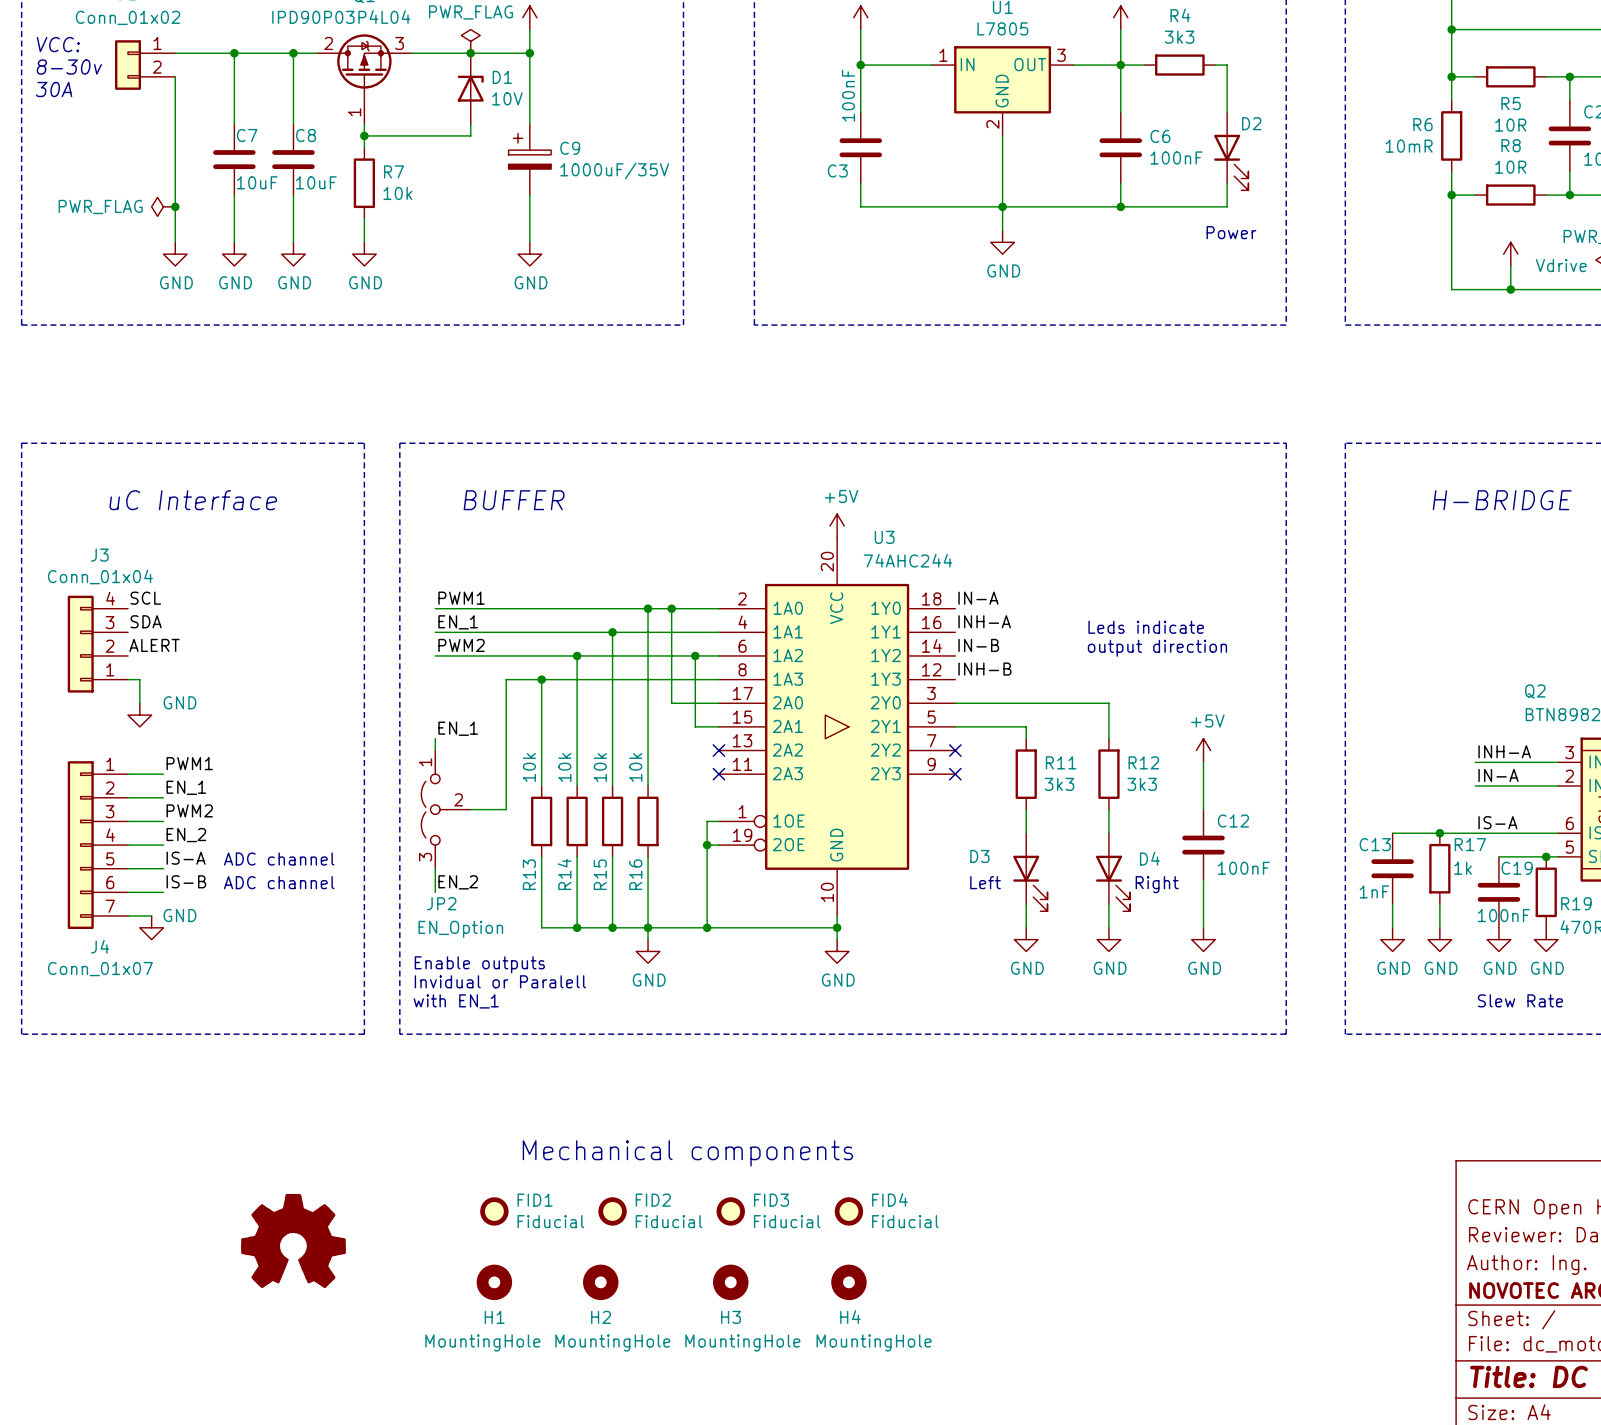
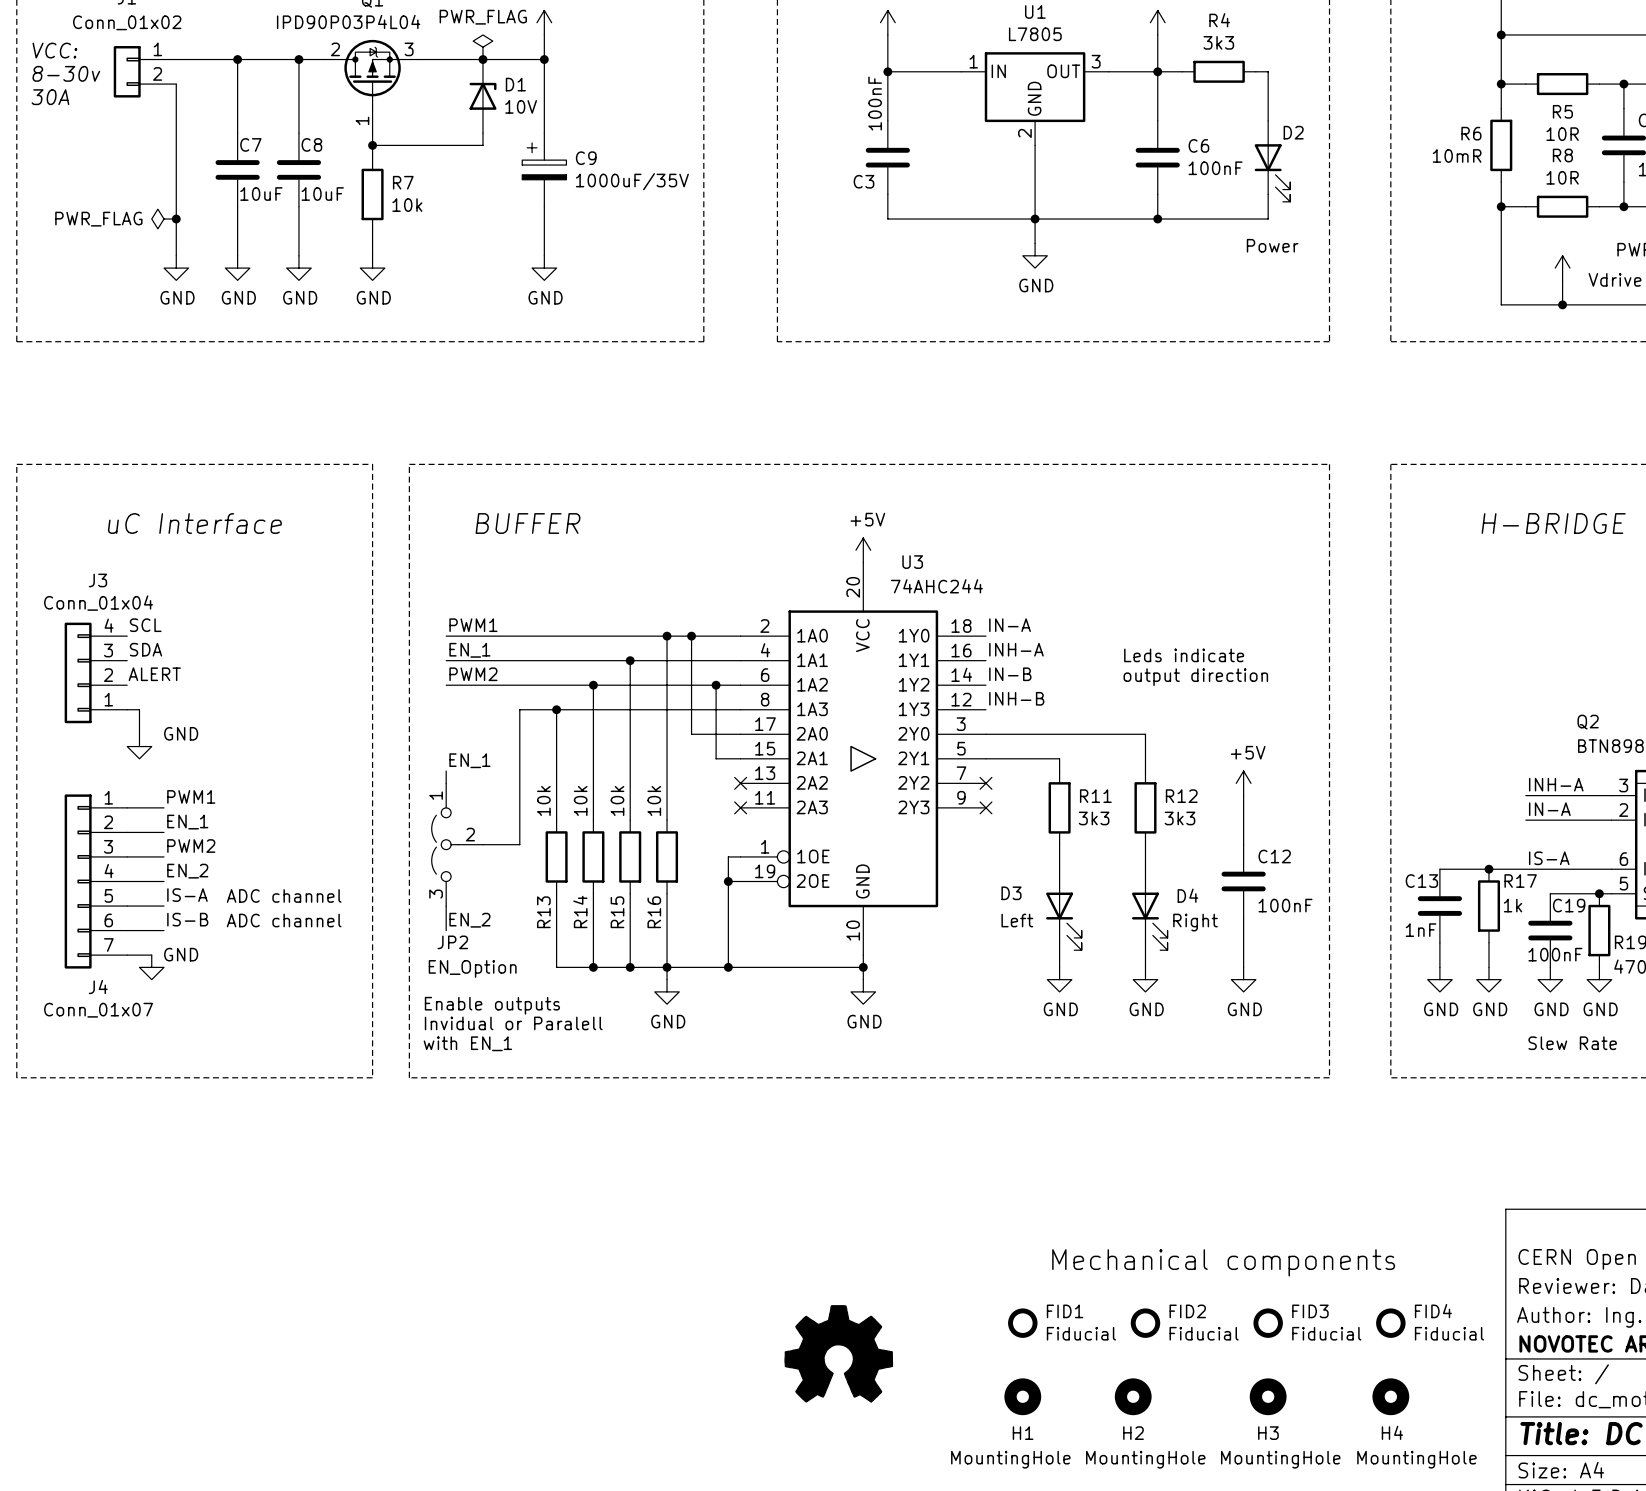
text: Mechanical components (687, 1153) -> none
FID1 position: (494, 1211) -> (1022, 1323)
FID2 position: (612, 1211) -> (1145, 1323)
FID3 position: (730, 1211) -> (1268, 1323)
FID4 position: (848, 1211) -> (1390, 1323)
text: none -> Mechanical components (1223, 1262)
part: (293, 1241) -> none
H1 position: (494, 1282) -> (1022, 1396)
H2 position: (600, 1282) -> (1133, 1396)
H3 position: (730, 1282) -> (1268, 1396)
H4 position: (848, 1282) -> (1390, 1396)
power symbol: none -> (838, 1353)

